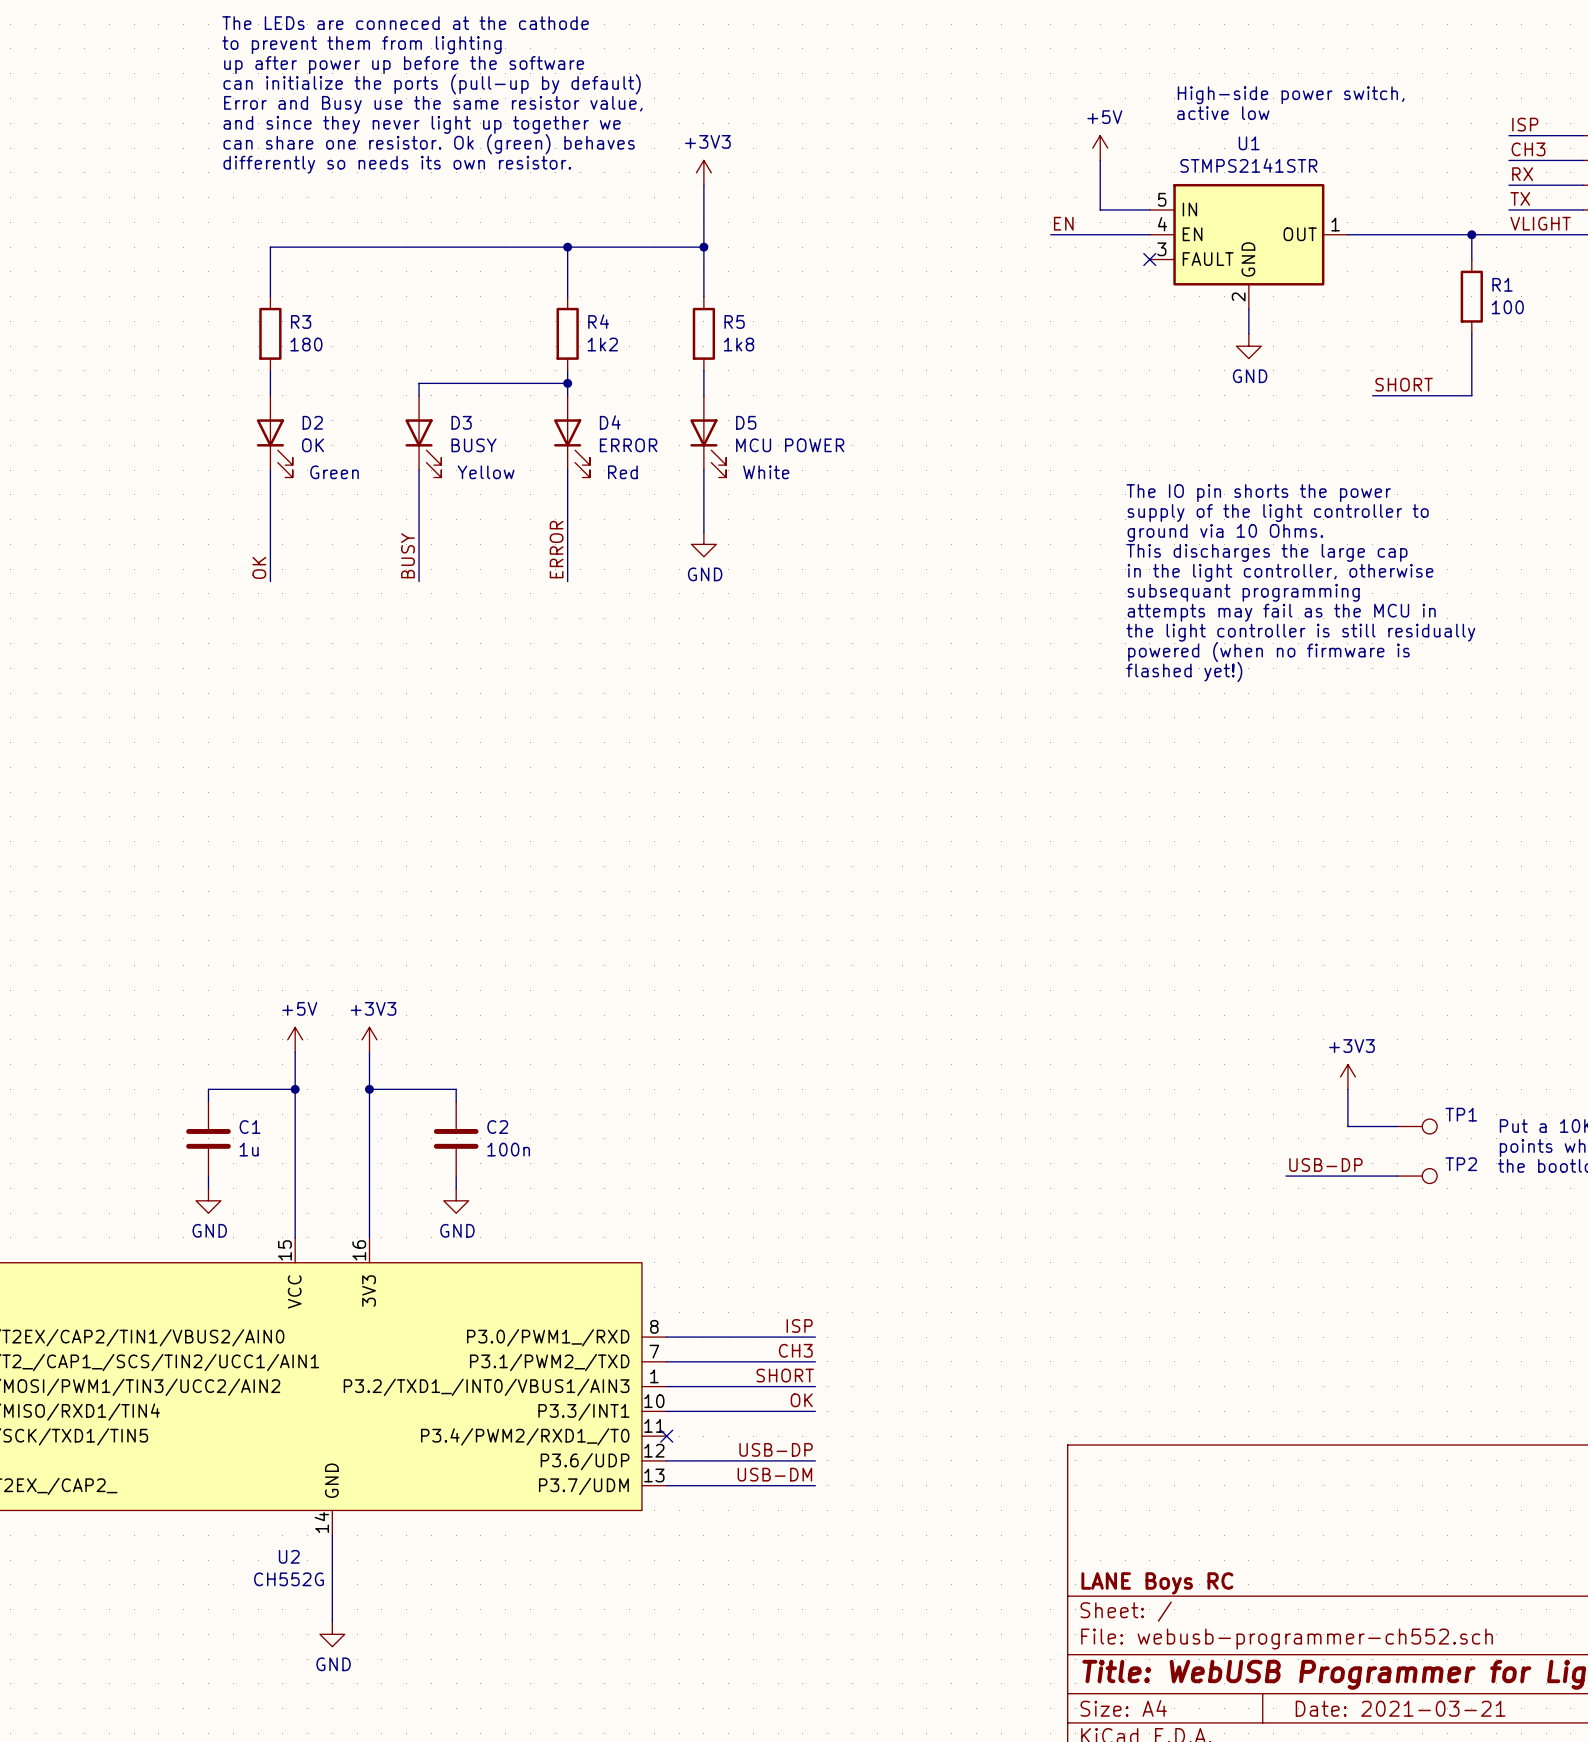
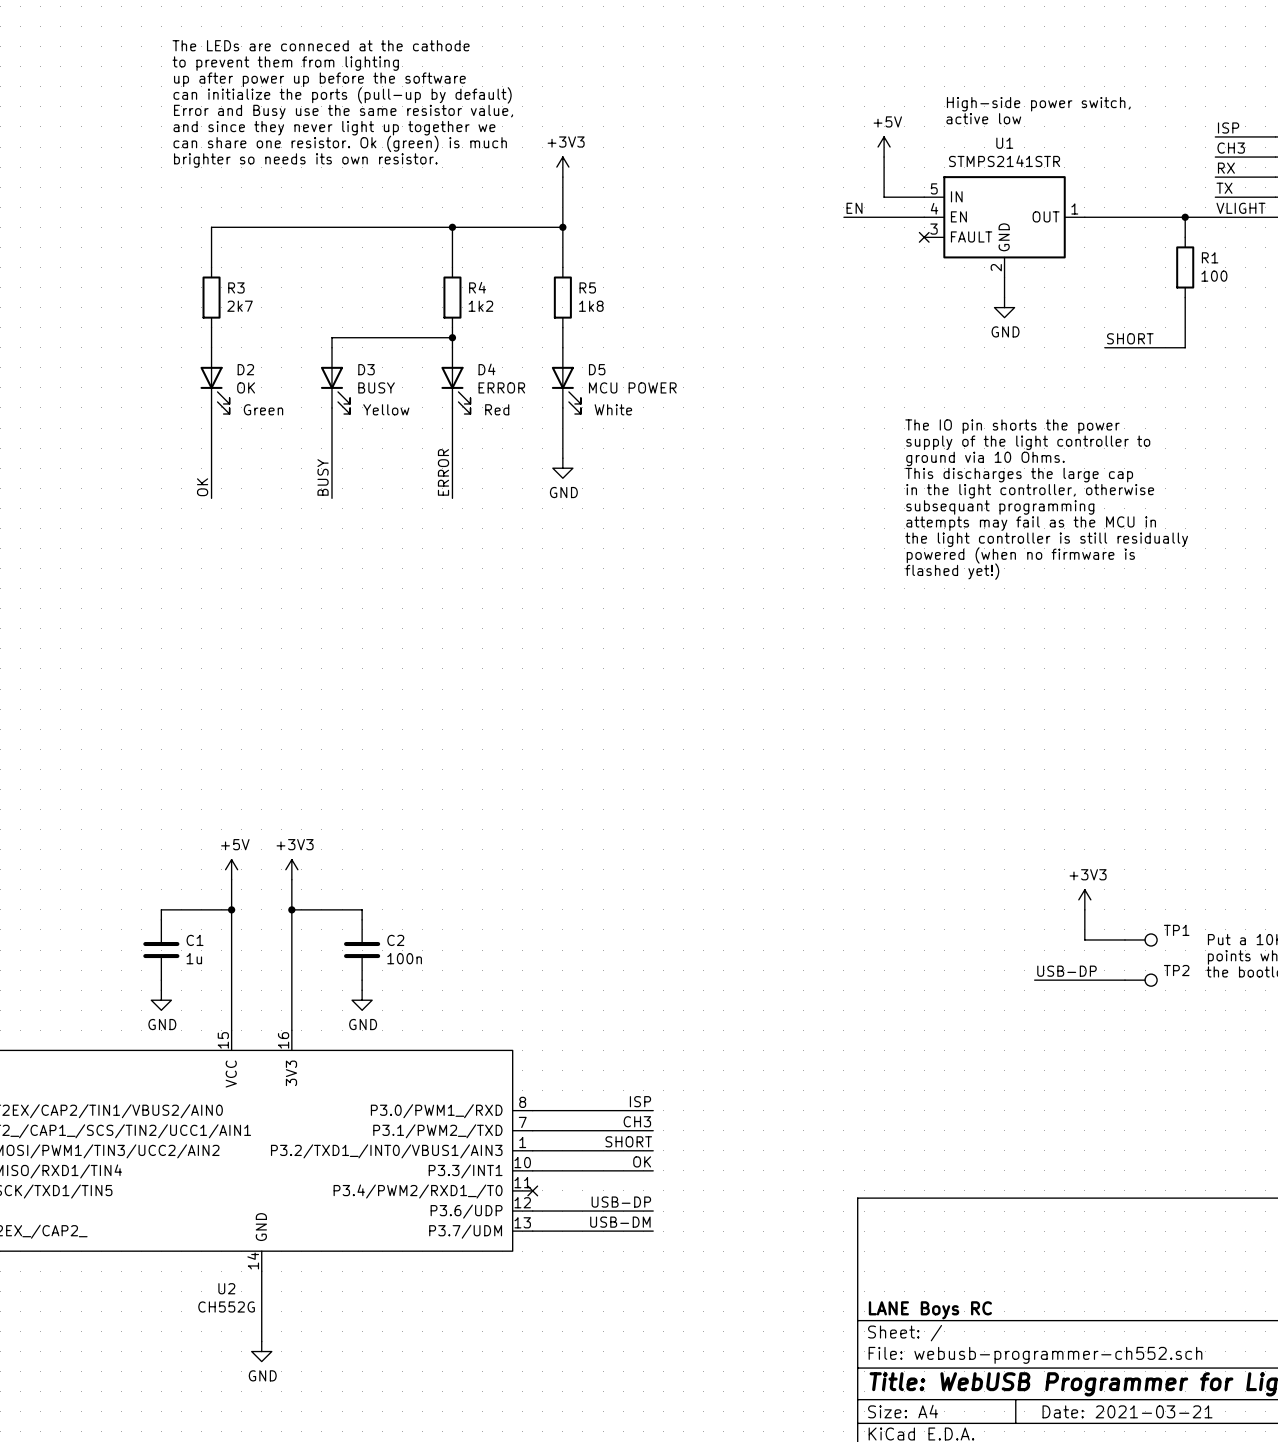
text: can share one resistor. Ok (green) behaves (429, 144) -> can share one resistor. Ok (green) is much (340, 143)
text: differently so needs its own resistor. (397, 164) -> brighter so needs its own resistor. (305, 160)
R3 value: 180 (306, 344) -> 2k7 (240, 306)

